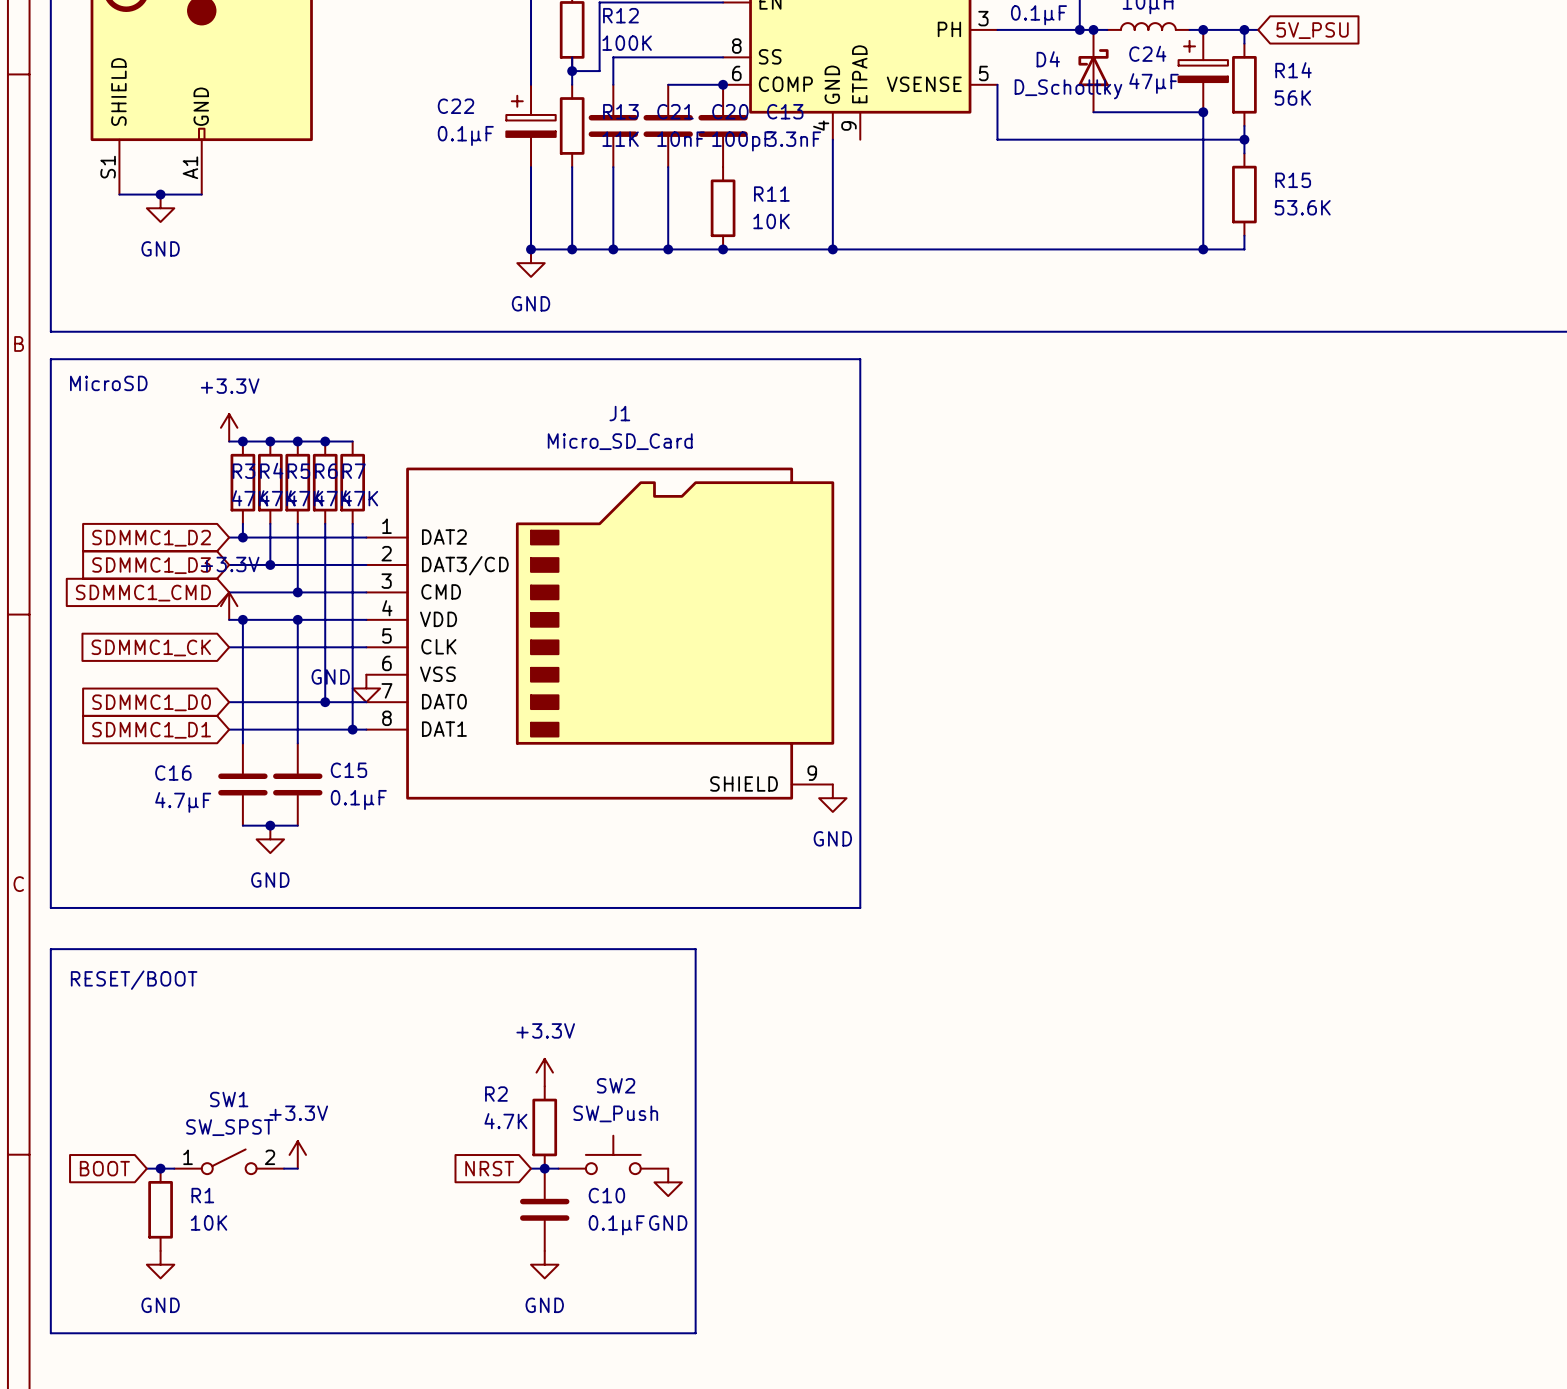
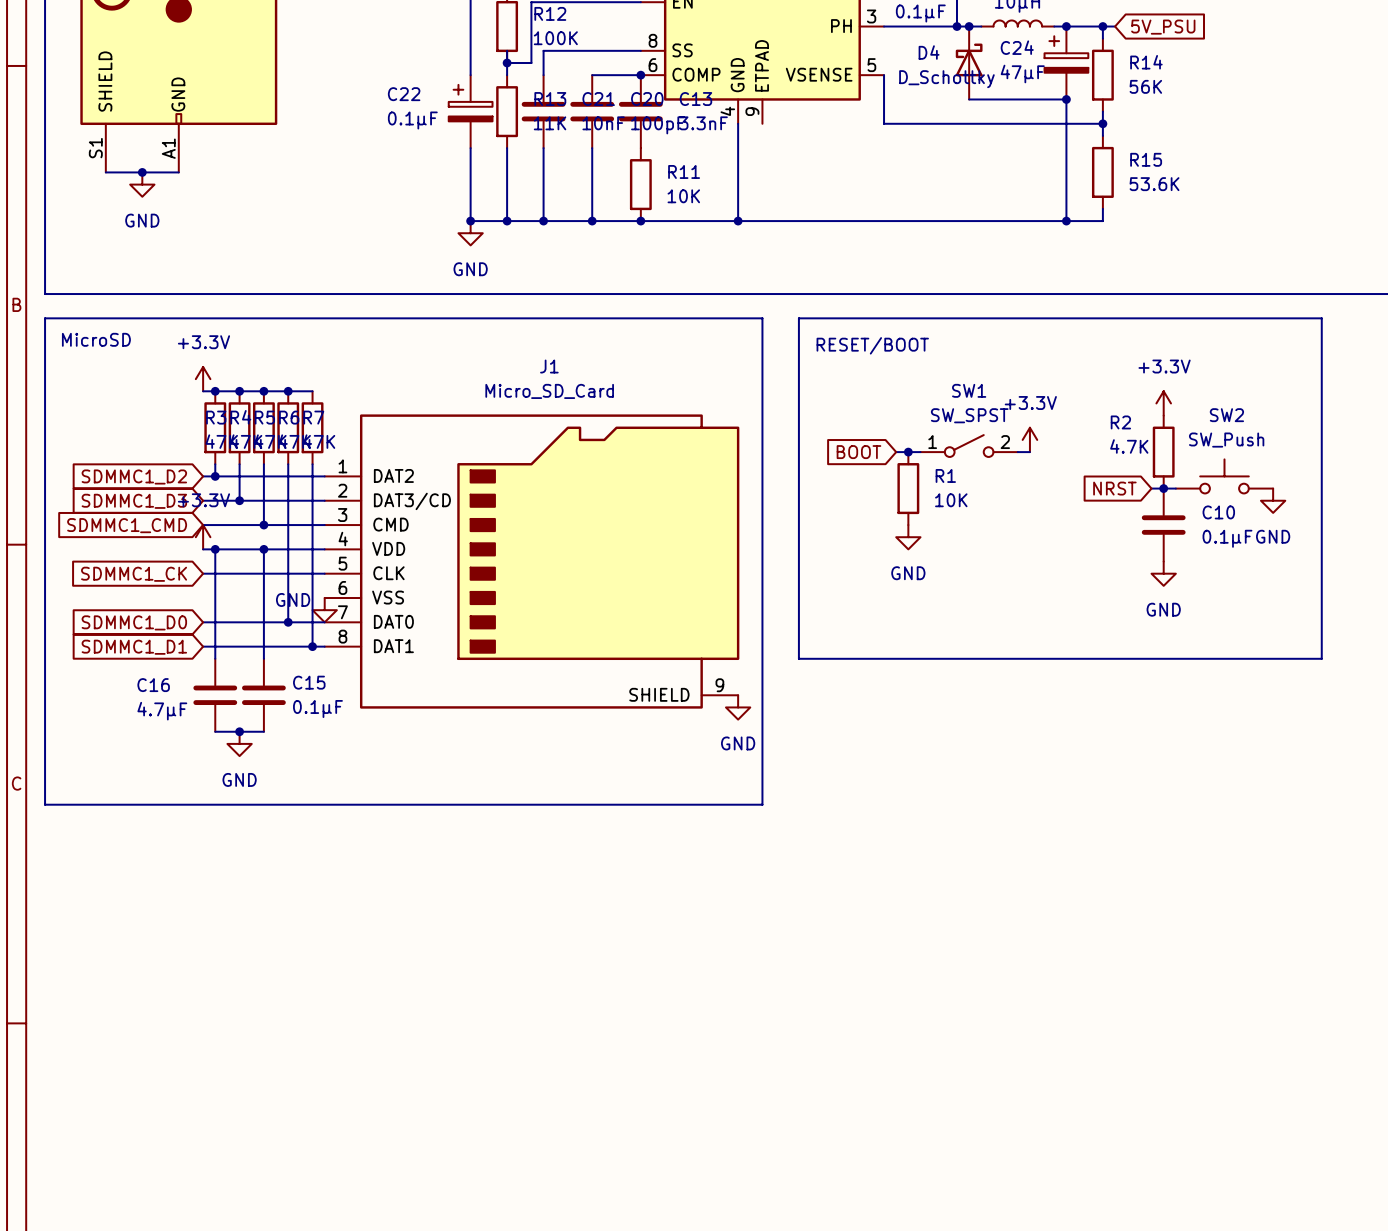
line: none -> (798, 318) (1321, 318) (1321, 658) (798, 658) (798, 318)
text: none -> RESET/BOOT (872, 345)
power symbol: none -> +3.3V (1163, 403)
power symbol: none -> +3.3V (1029, 439)
global label: none -> BOOT (858, 452)
wire: none -> (896, 452) (920, 452)
junction: none -> (908, 452)
wire: none -> (1017, 452) (1029, 452)
global label: none -> NRST (1114, 488)
wire: none -> (1151, 488) (1175, 488)
junction: none -> (1163, 488)
power symbol: none -> GND (1273, 500)
power symbol: none -> GND (908, 537)
power symbol: none -> GND (1163, 573)
line: (50, 949) (50, 1333) (695, 1333) (695, 949) (50, 949) -> none
text: RESET/BOOT (134, 980) -> none
power symbol: +3.3V (544, 1072) -> none
R2 position: (544, 1127) -> (1163, 452)
power symbol: +3.3V (297, 1154) -> none
SW2 position: (613, 1154) -> (1224, 476)
SW1 position: (229, 1161) -> (969, 446)
global label: BOOT (104, 1168) -> none
wire: (146, 1168) (174, 1168) -> none
junction: (160, 1168) -> none
wire: (284, 1168) (297, 1168) -> none
global label: NRST (489, 1168) -> none
wire: (531, 1168) (558, 1168) -> none
junction: (544, 1168) -> none
power symbol: GND (668, 1182) -> none
R1 position: (160, 1209) -> (908, 488)
C10 position: (544, 1209) -> (1163, 525)
power symbol: GND (160, 1264) -> none
power symbol: GND (544, 1264) -> none

